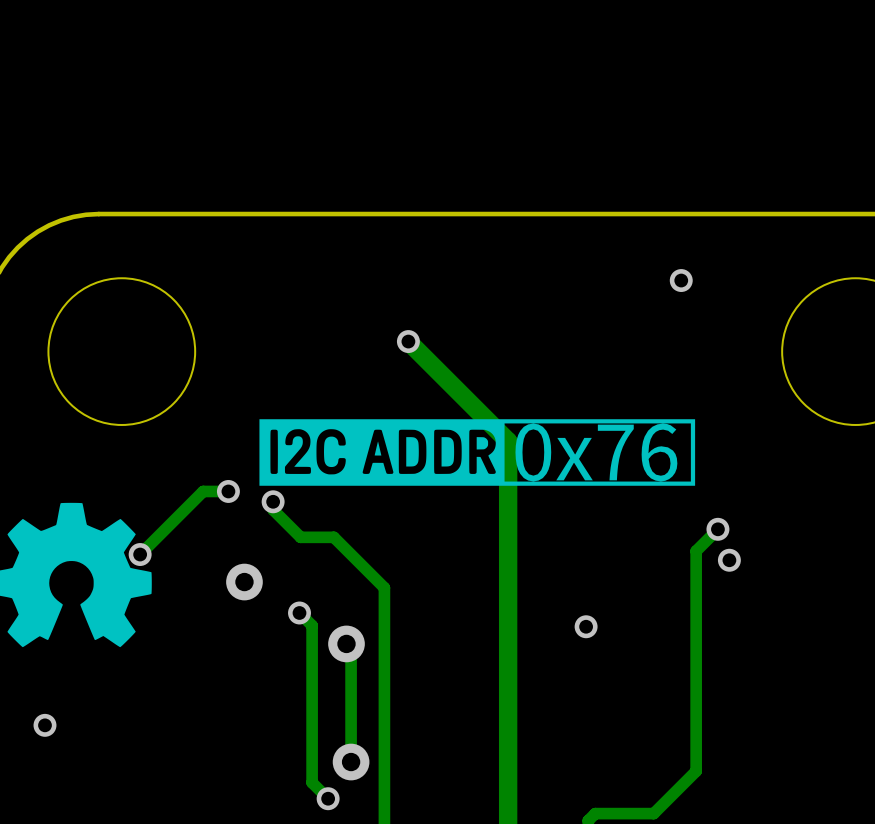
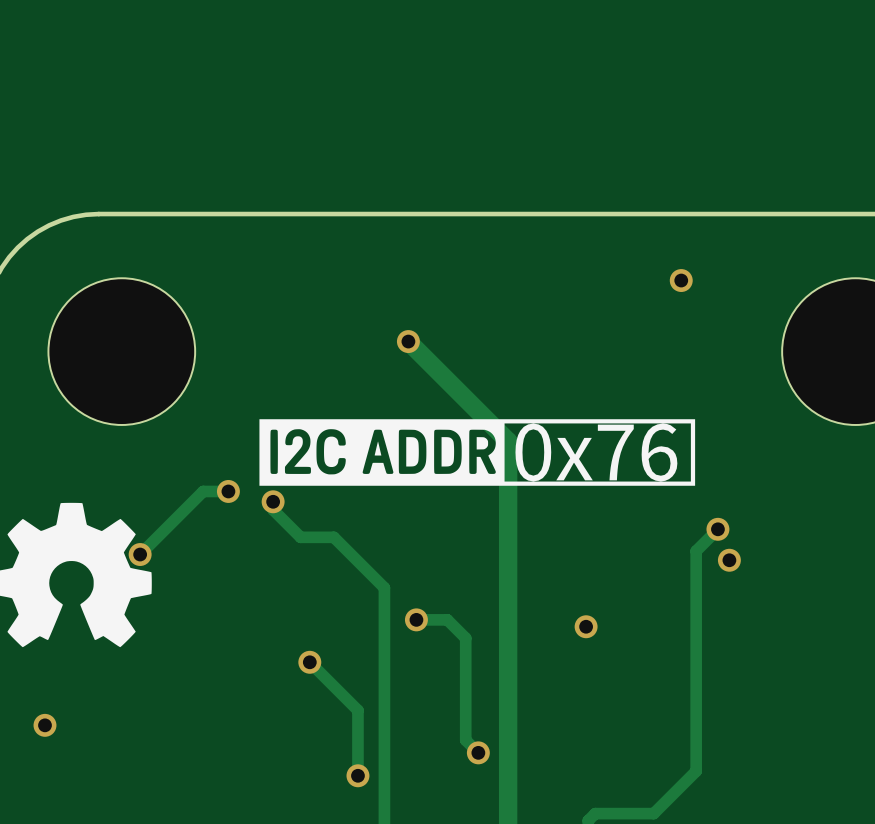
via: (244, 582) -> none
track: (299, 612) (312, 625) (312, 782) (328, 798) -> none
via position: (299, 612) -> (309, 662)
track: none -> (416, 619) (447, 619) (465, 638) (465, 740) (478, 752)
via: none -> (416, 619)
track: (346, 643) (351, 648) (351, 762) -> none
via: (346, 643) -> none
track: none -> (309, 662) (357, 710) (357, 775)
via size: [332, 743, 370, 781] -> [346, 764, 370, 788]
via: none -> (478, 752)
via: (328, 798) -> none

